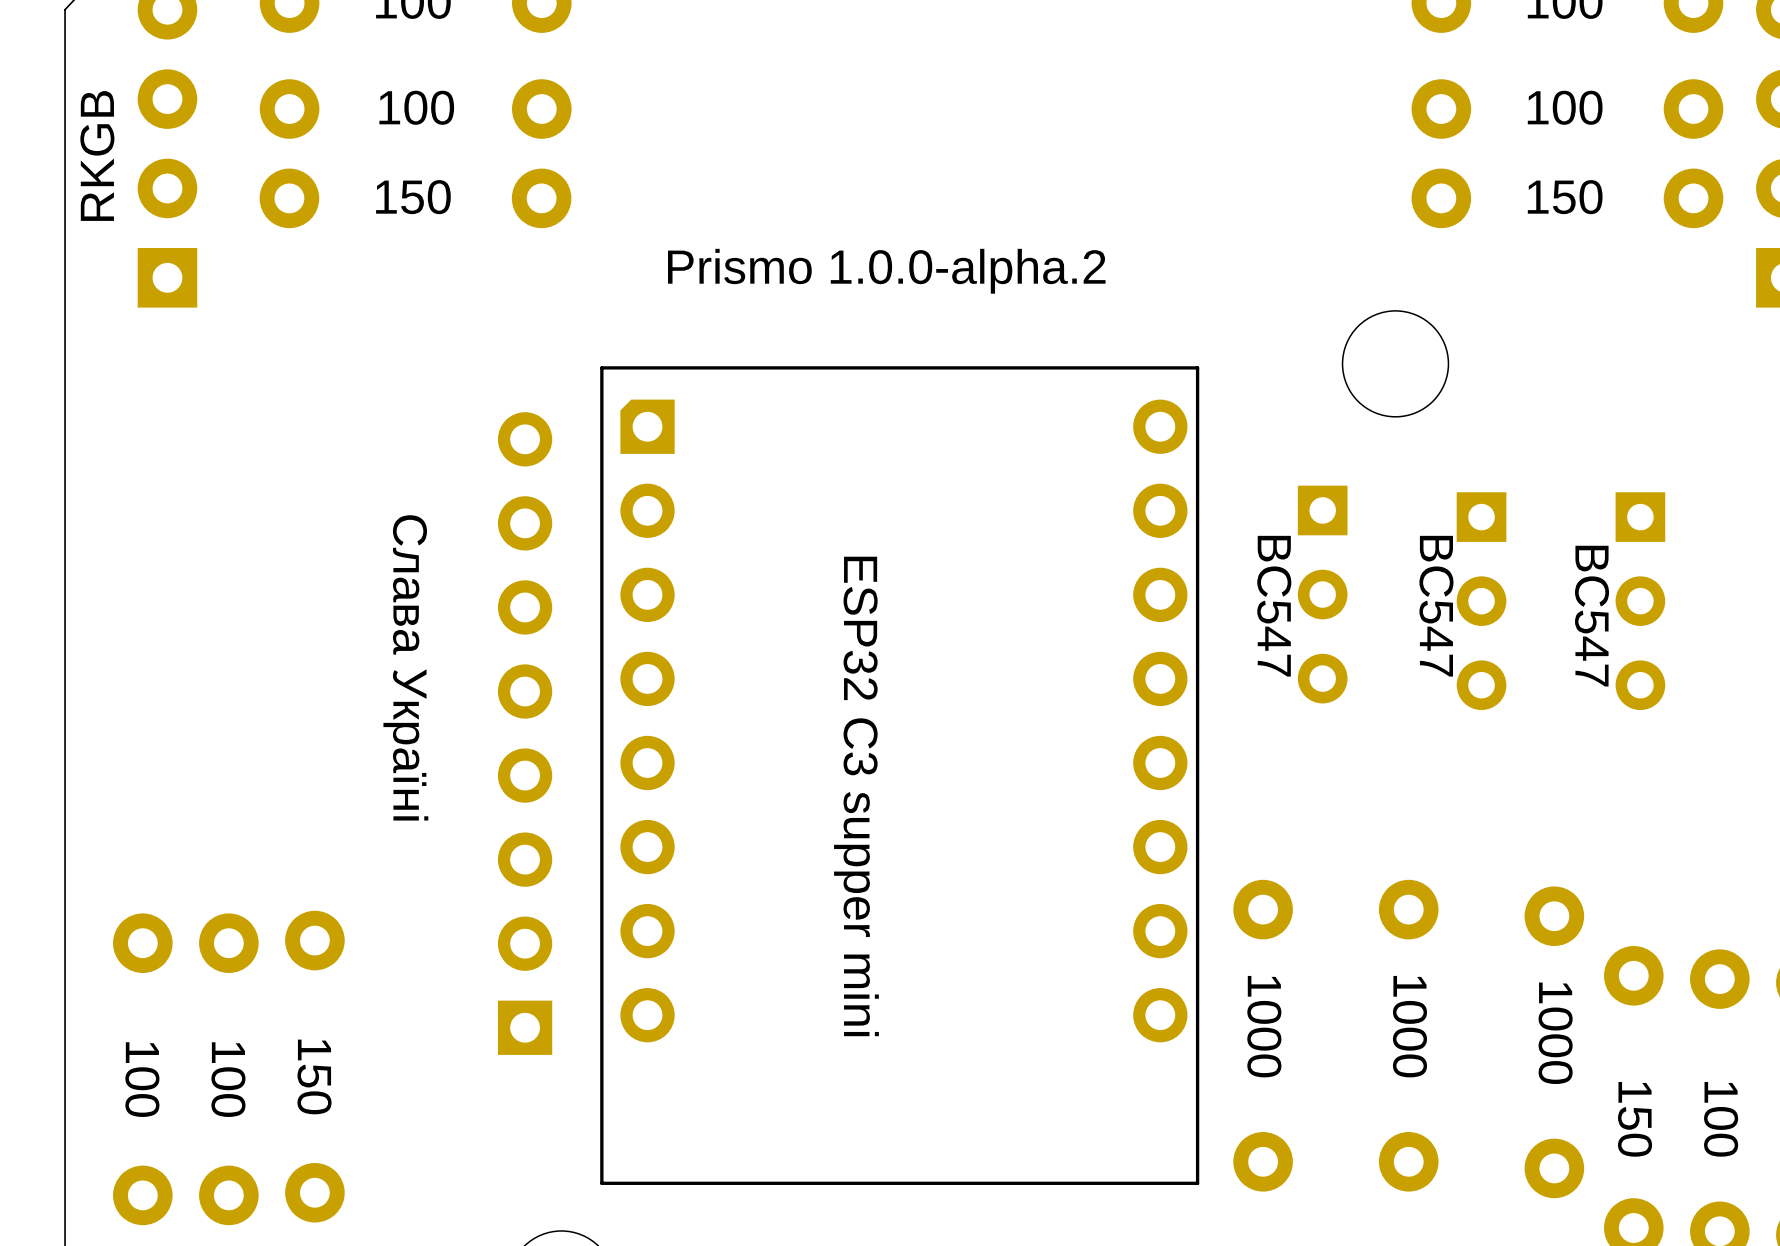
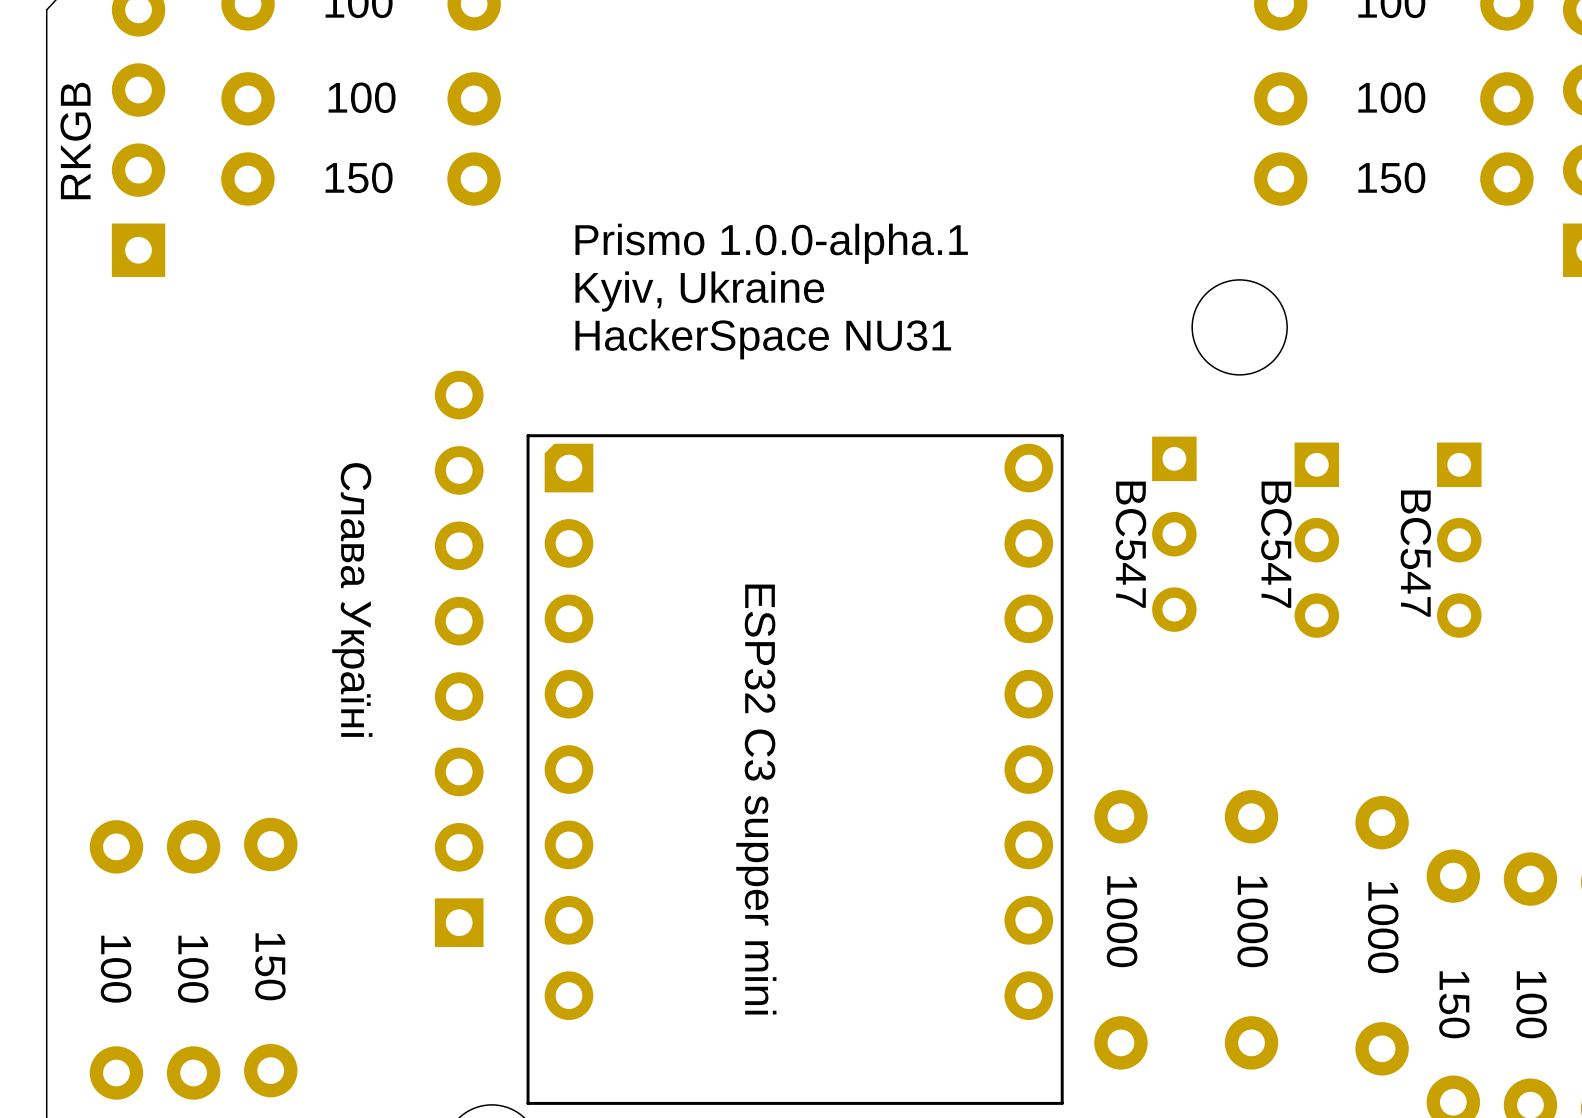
text: Prismo 1.0.0-alpha.2 (886, 271) -> Prismo 1.0.0-alpha.1 (771, 243)
text: none -> Kyiv, Ukraine (699, 291)
text: none -> HackerSpace NU31 (763, 339)
part: ESP32 C3 supper mini (899, 775) -> none
part: none -> ESP32 C3 supper mini (795, 769)

